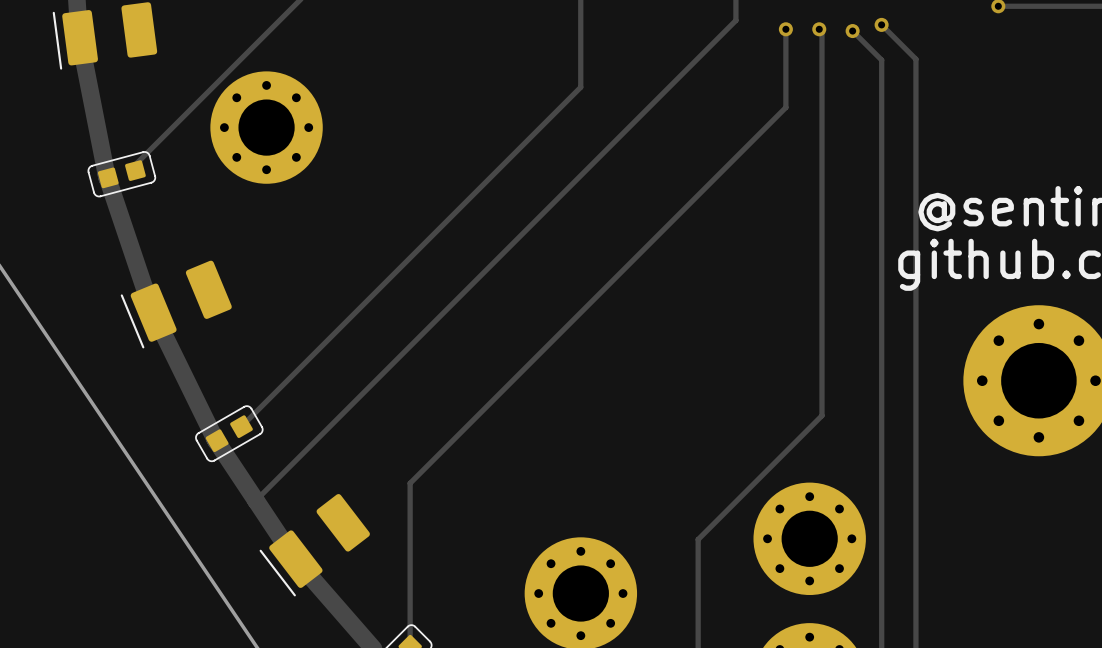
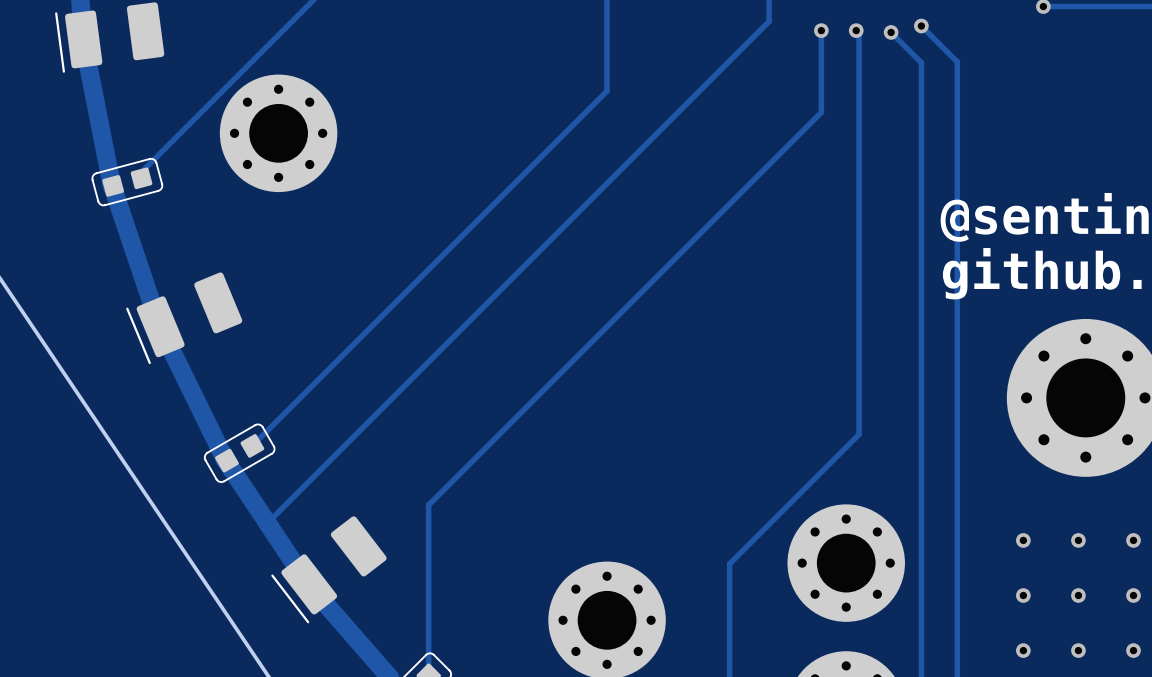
via: none -> (1023, 540)
via: none -> (1078, 540)
via: none -> (1133, 540)
via: none -> (1023, 595)
via: none -> (1078, 595)
via: none -> (1133, 595)
via: none -> (1023, 650)
via: none -> (1078, 650)
via: none -> (1133, 650)

